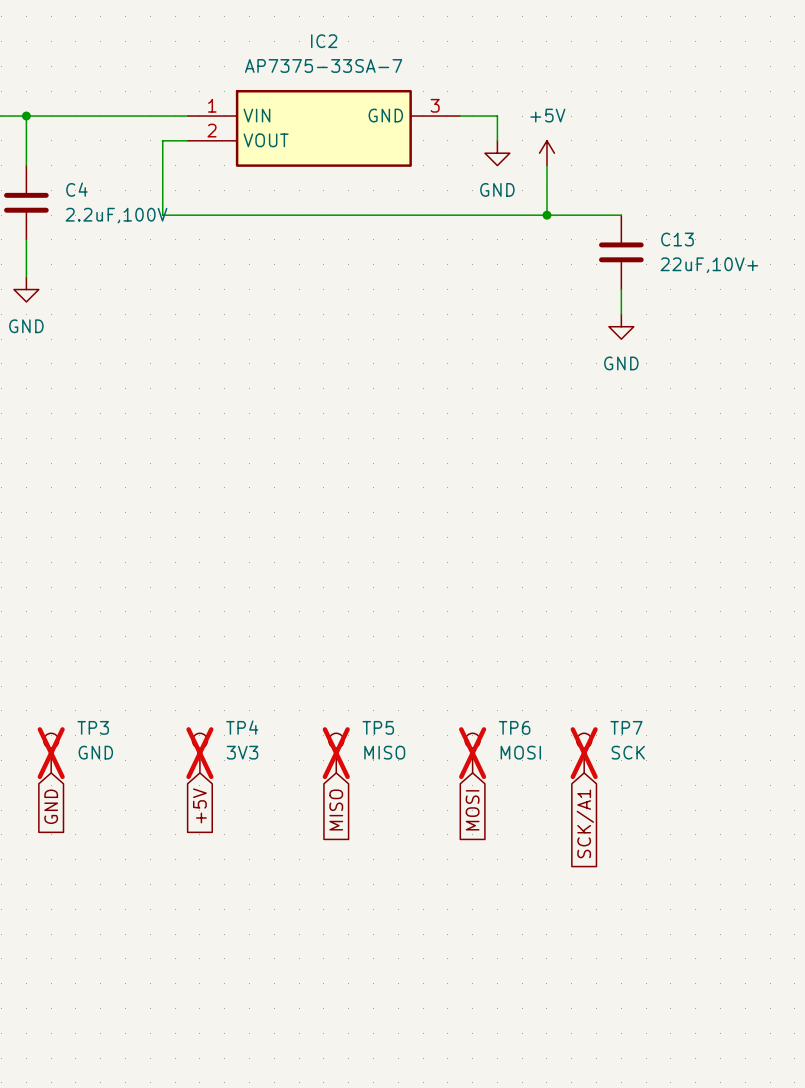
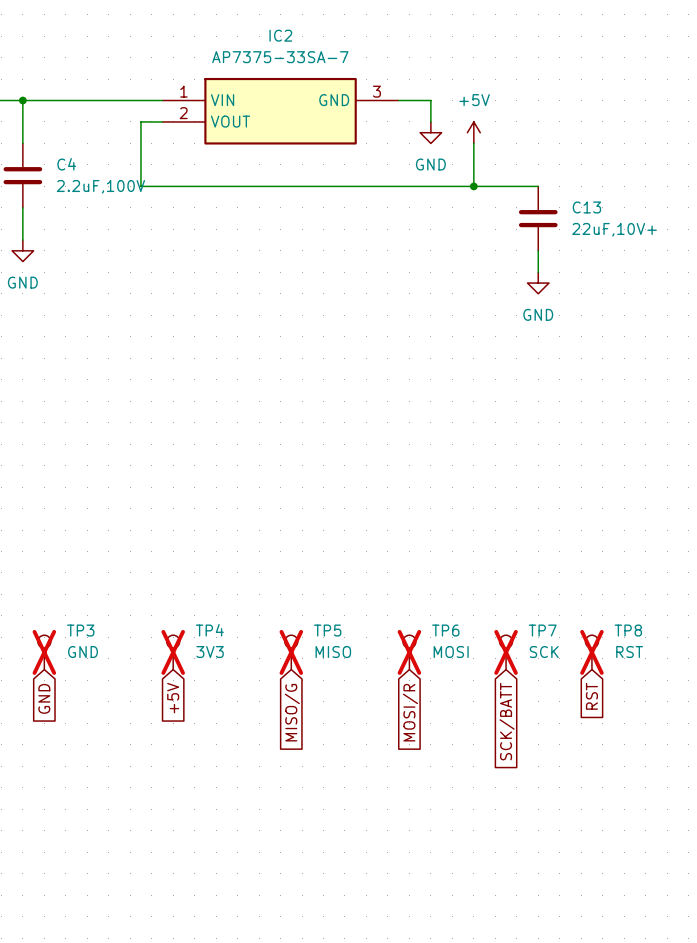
TP8: none -> RST (591, 652)
global label: none -> RST (591, 696)
global label: MISO (336, 810) -> MISO/G (292, 712)
global label: MOSI (472, 810) -> MOSI/R (410, 712)
global label: SCK/A1 (585, 823) -> SCK/BATT (507, 721)

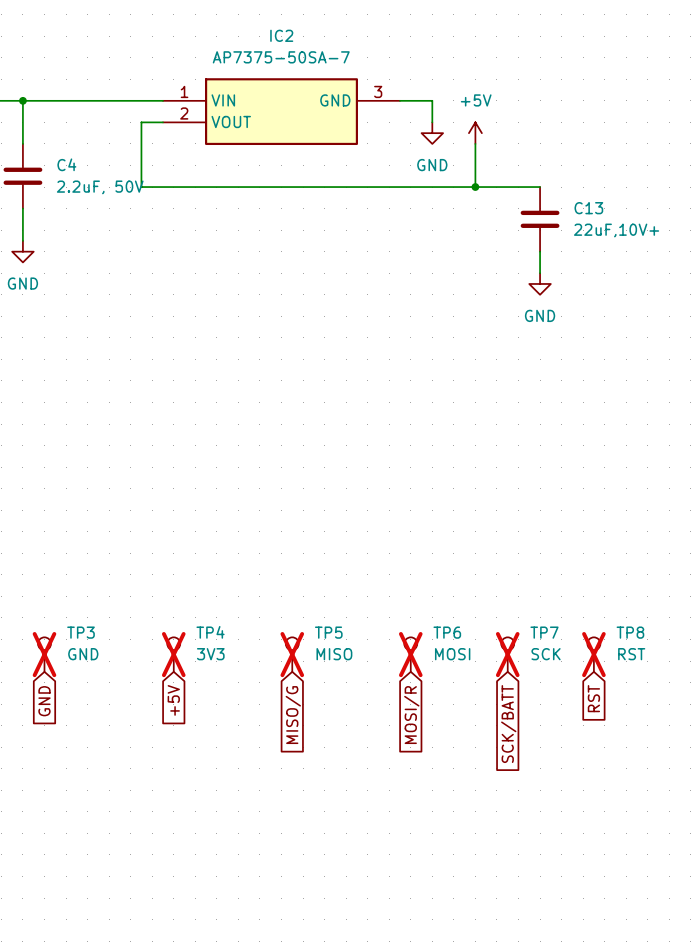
IC2 value: AP7375-33SA-7 (280, 57) -> AP7375-50SA-7 (281, 57)
C4 value: 2.2uF,100V (100, 186) -> 2.2uF, 50V (100, 187)

